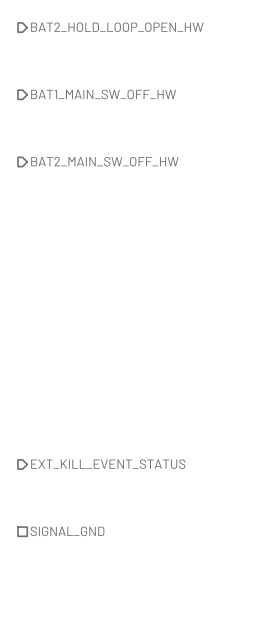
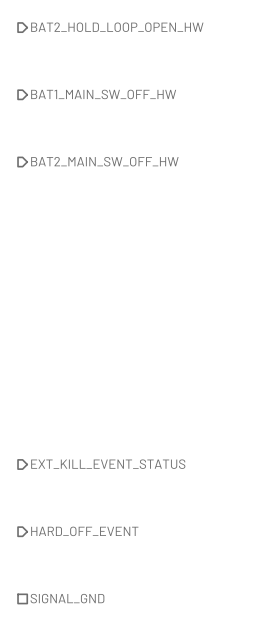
hierarchical label shape: passive (67, 531) -> output (84, 531)
hierarchical label: SIGNAL_GND (67, 531) -> HARD_OFF_EVENT (84, 531)
hierarchical label: none -> SIGNAL_GND (67, 598)

